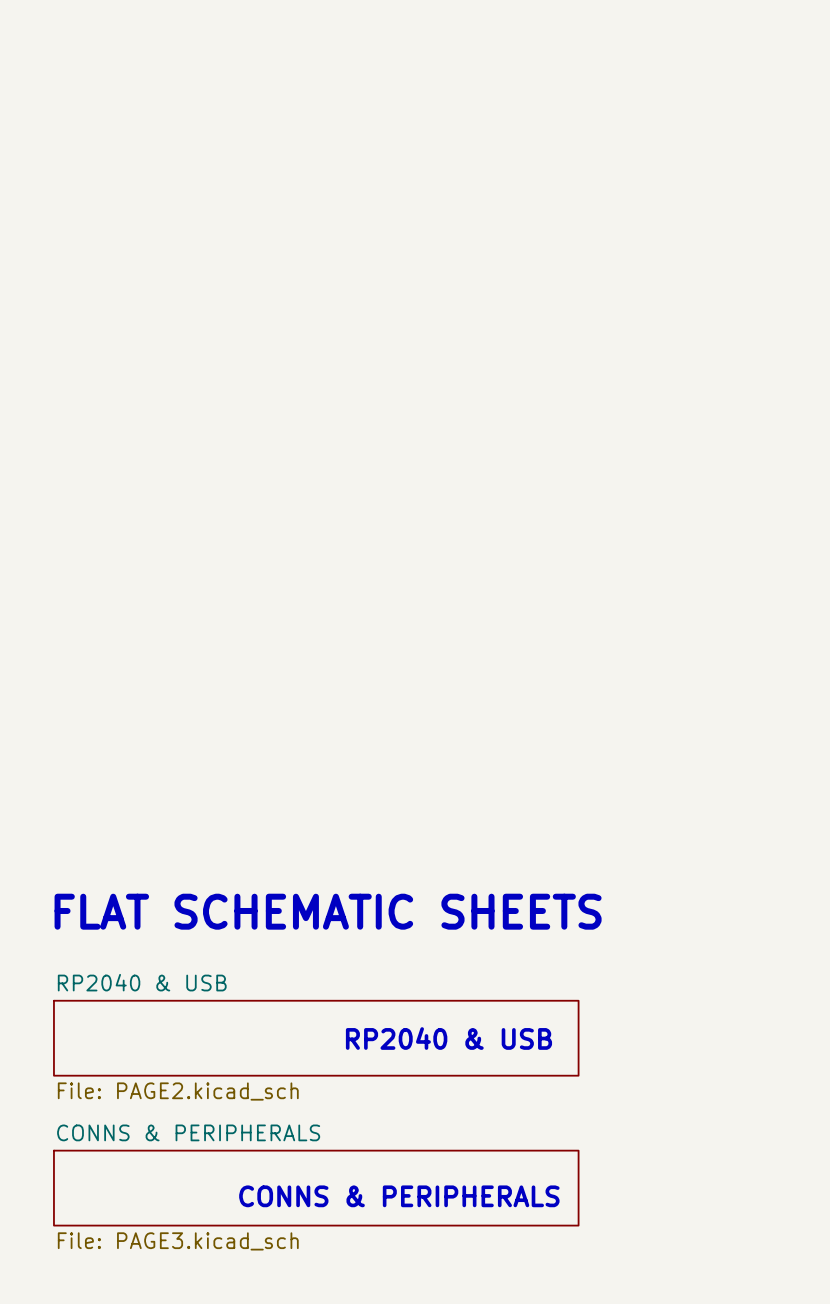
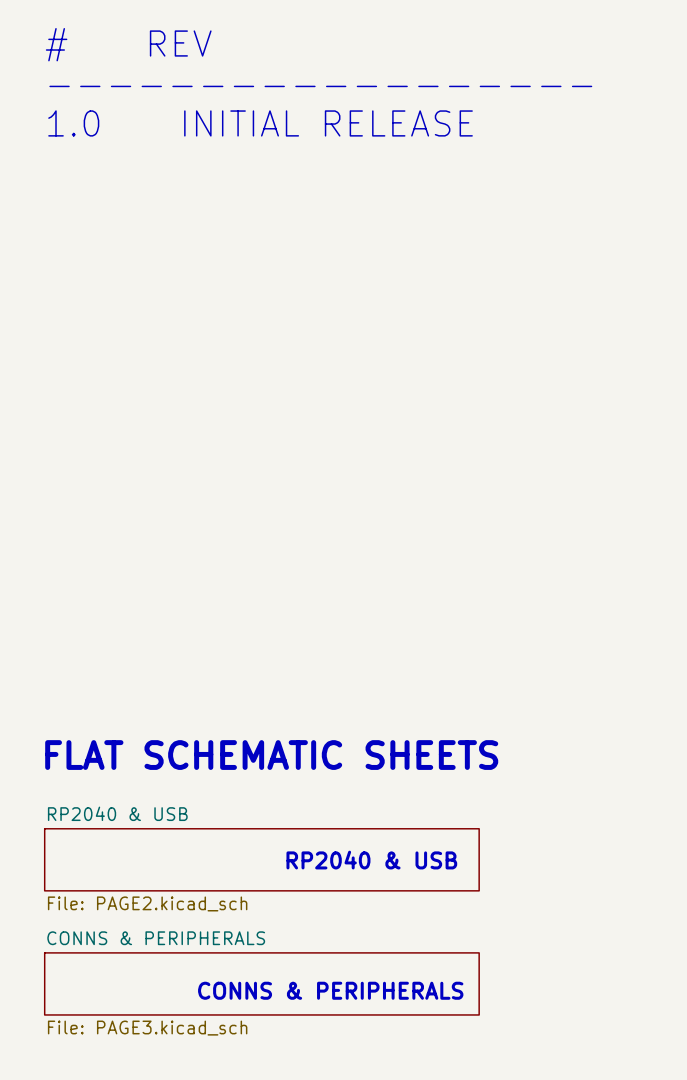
text: none -> # REV (128, 44)
text: none -> ------------------ (320, 86)
text: none -> 1.0 INITIAL RELEASE (260, 123)

